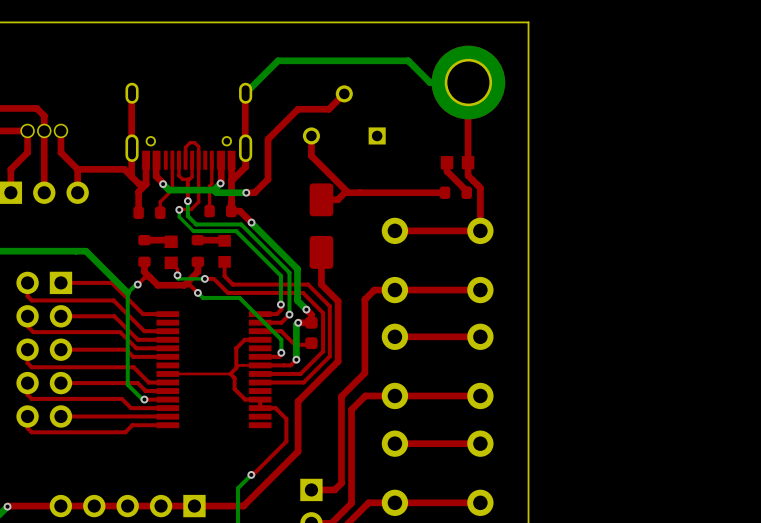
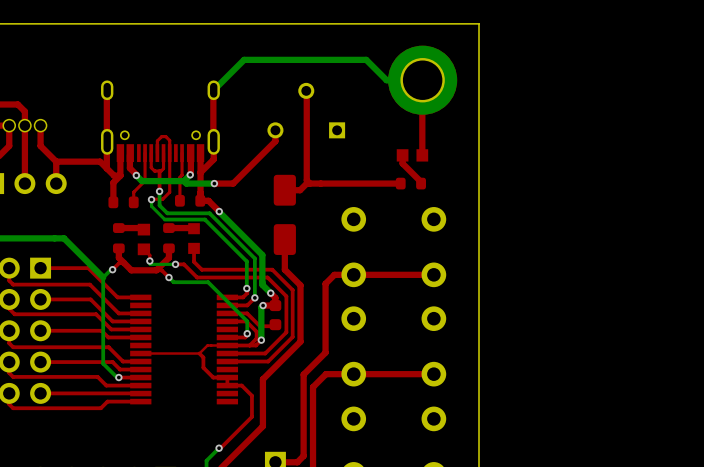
top track: (344, 93) (328, 109) (298, 109) (268, 139) (268, 179) (254, 192) -> (275, 141) (233, 183) (222, 183)
top track: (311, 147) (311, 156) (344, 189) -> (306, 90) (306, 180)
top track: (468, 162) (468, 175) (480, 188) (480, 230) (394, 230) -> none
top track: (480, 336) (394, 336) -> none
top track: (260, 339) (244, 339) (236, 348) (236, 368) (230, 373) -> (227, 321) (246, 321) (256, 331) (256, 338) (249, 345)
top track: (480, 443) (394, 443) -> none

